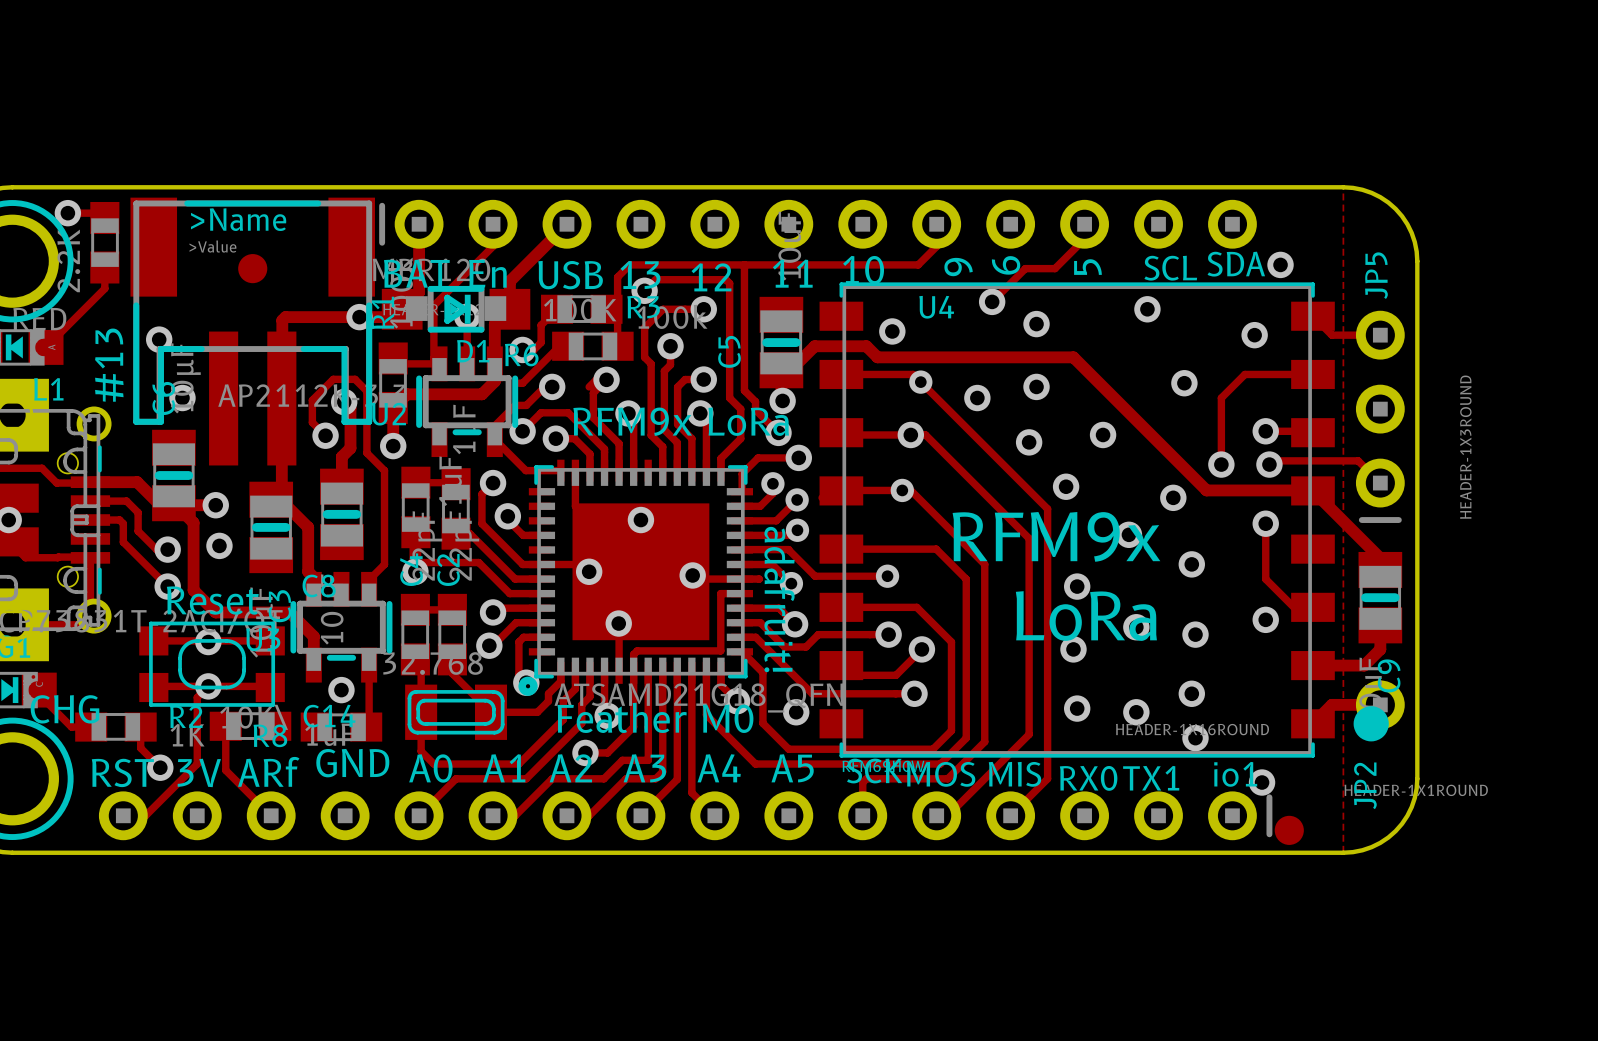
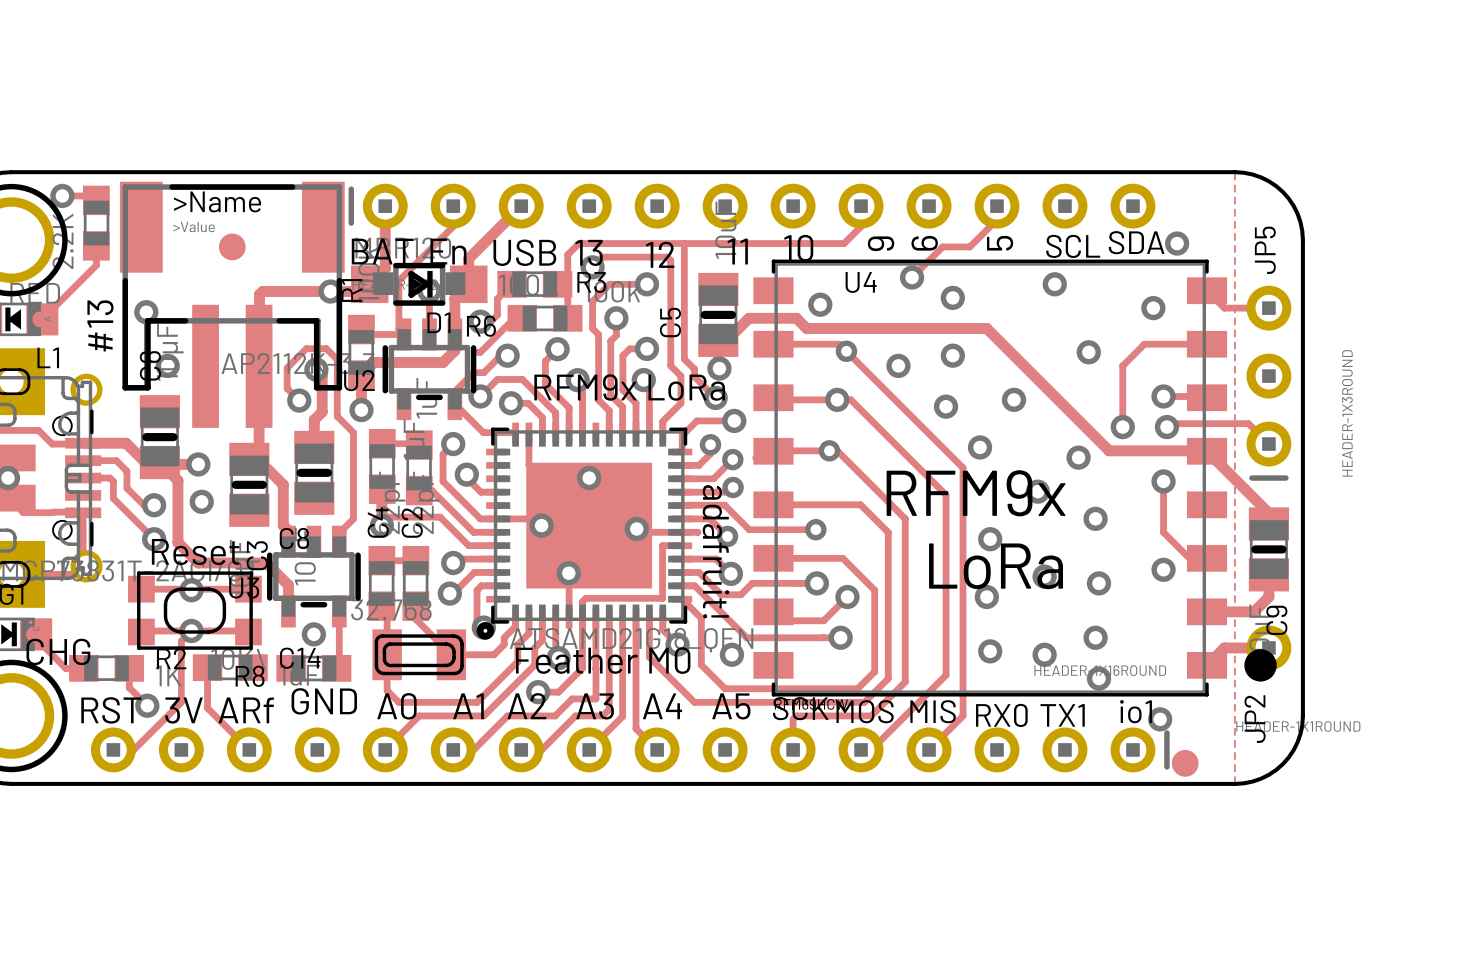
track: (596, 379) (589, 386) -> none

